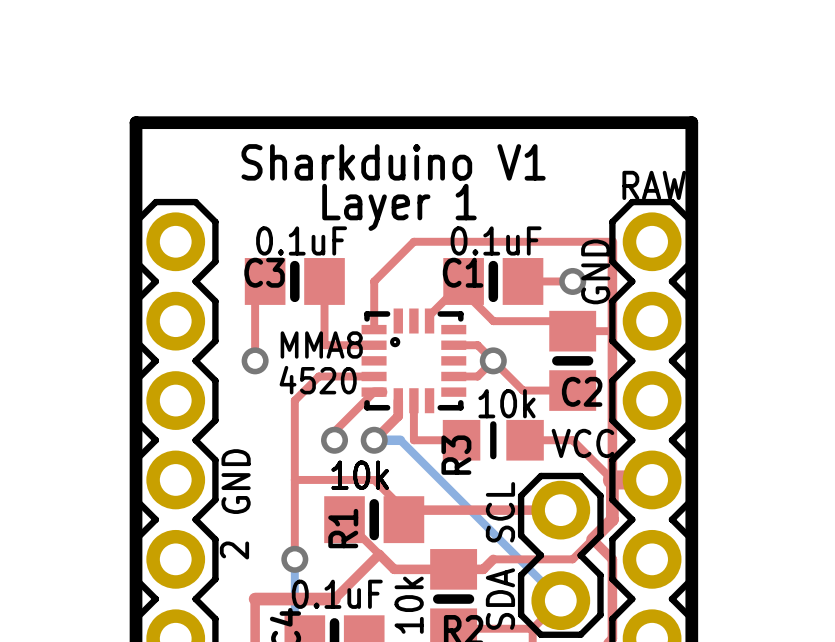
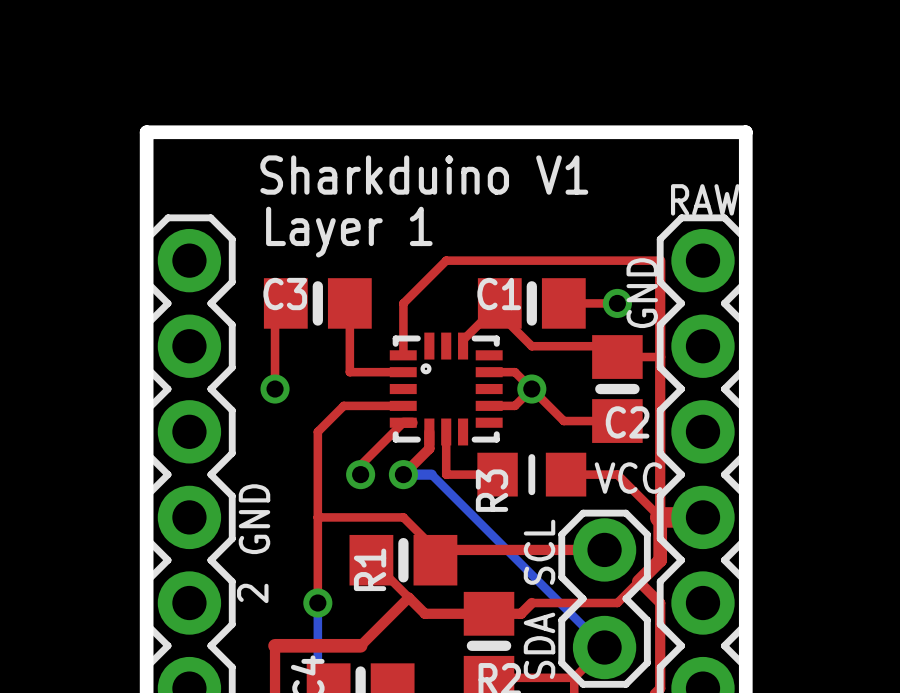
text position: Layer 1 (399, 207) -> Layer 1 (349, 232)
text: 0.1uF (301, 240) -> none
text: 0.1uF (496, 240) -> none
text: MMA8 (321, 344) -> none
text: 4520 (318, 380) -> none
text: 10k (507, 403) -> none
text: 10k (360, 475) -> none
text: 0.1uF (337, 594) -> none
text: 10k (409, 605) -> none

